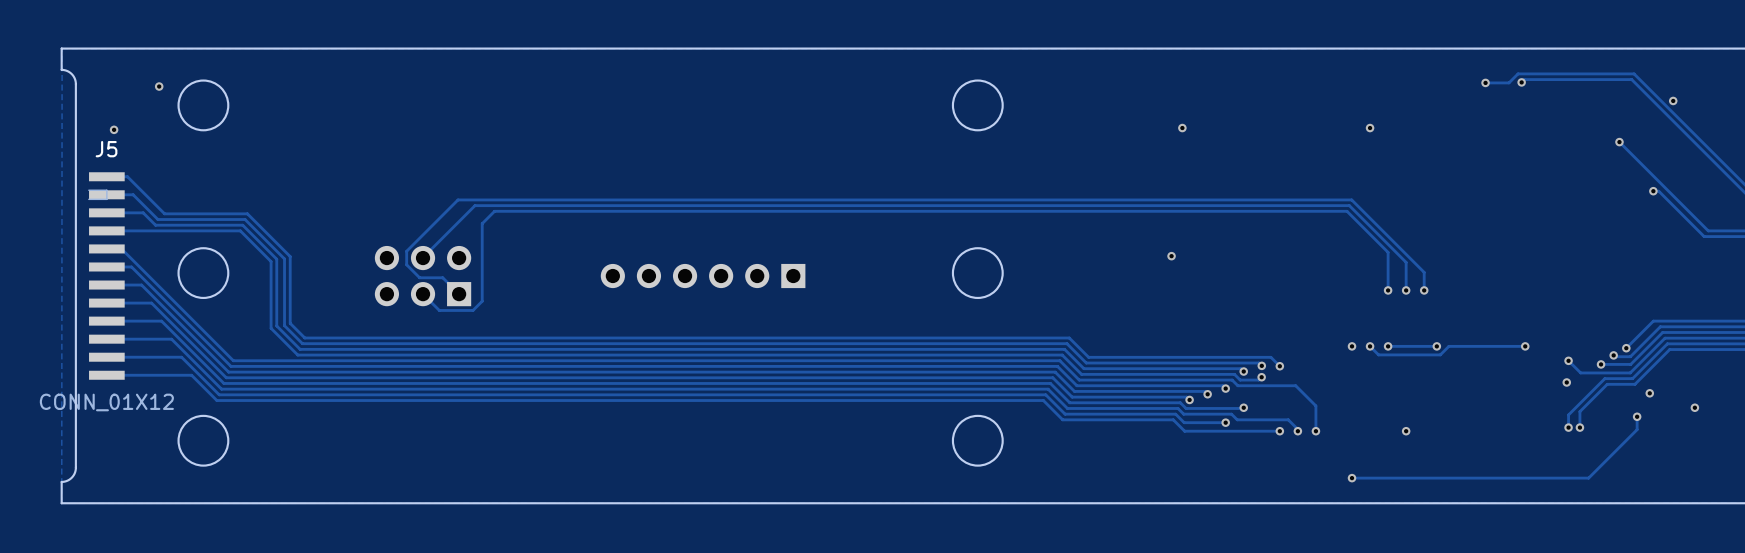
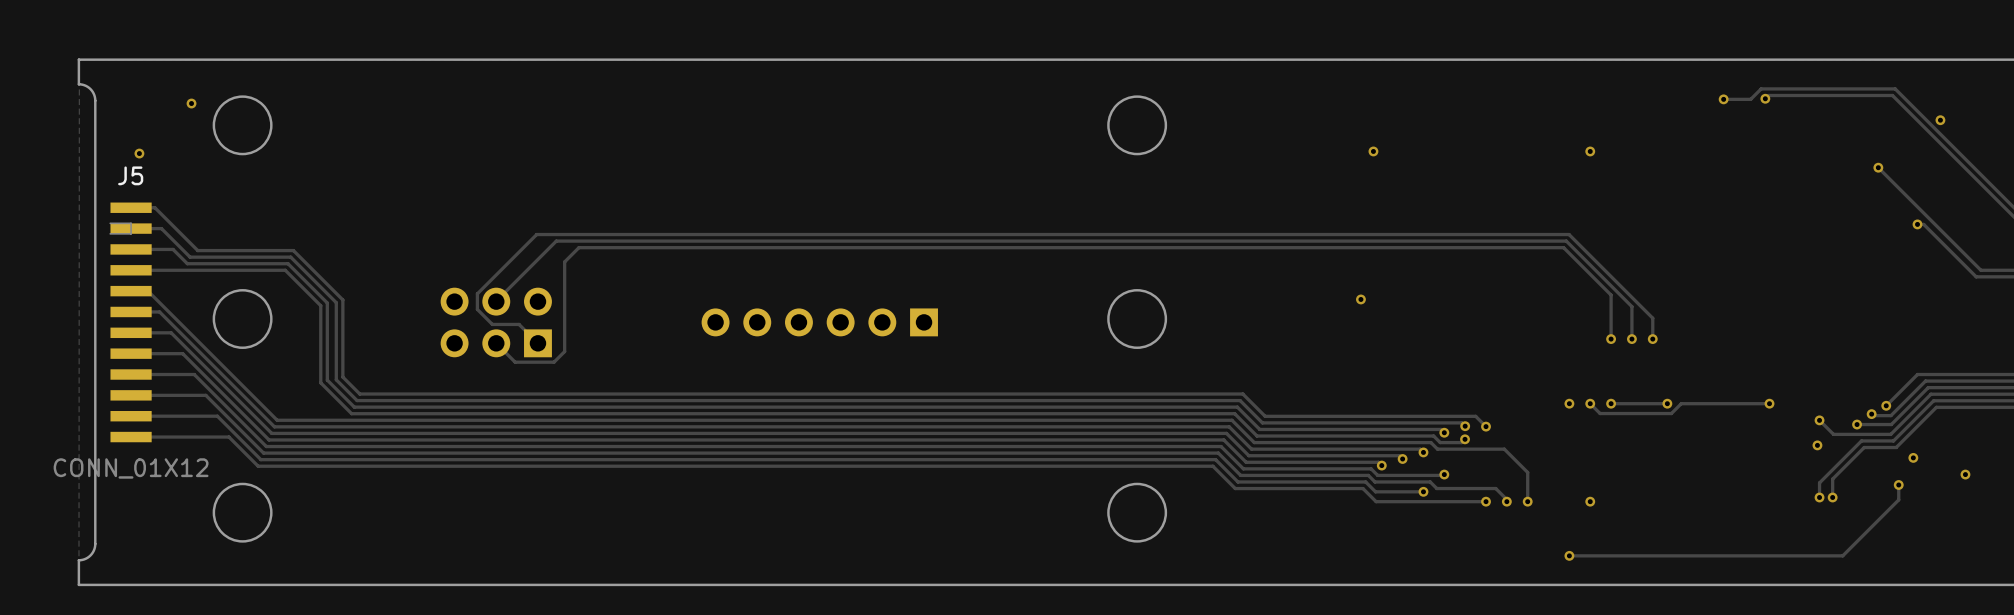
via position: (1406, 431) -> (1590, 501)

